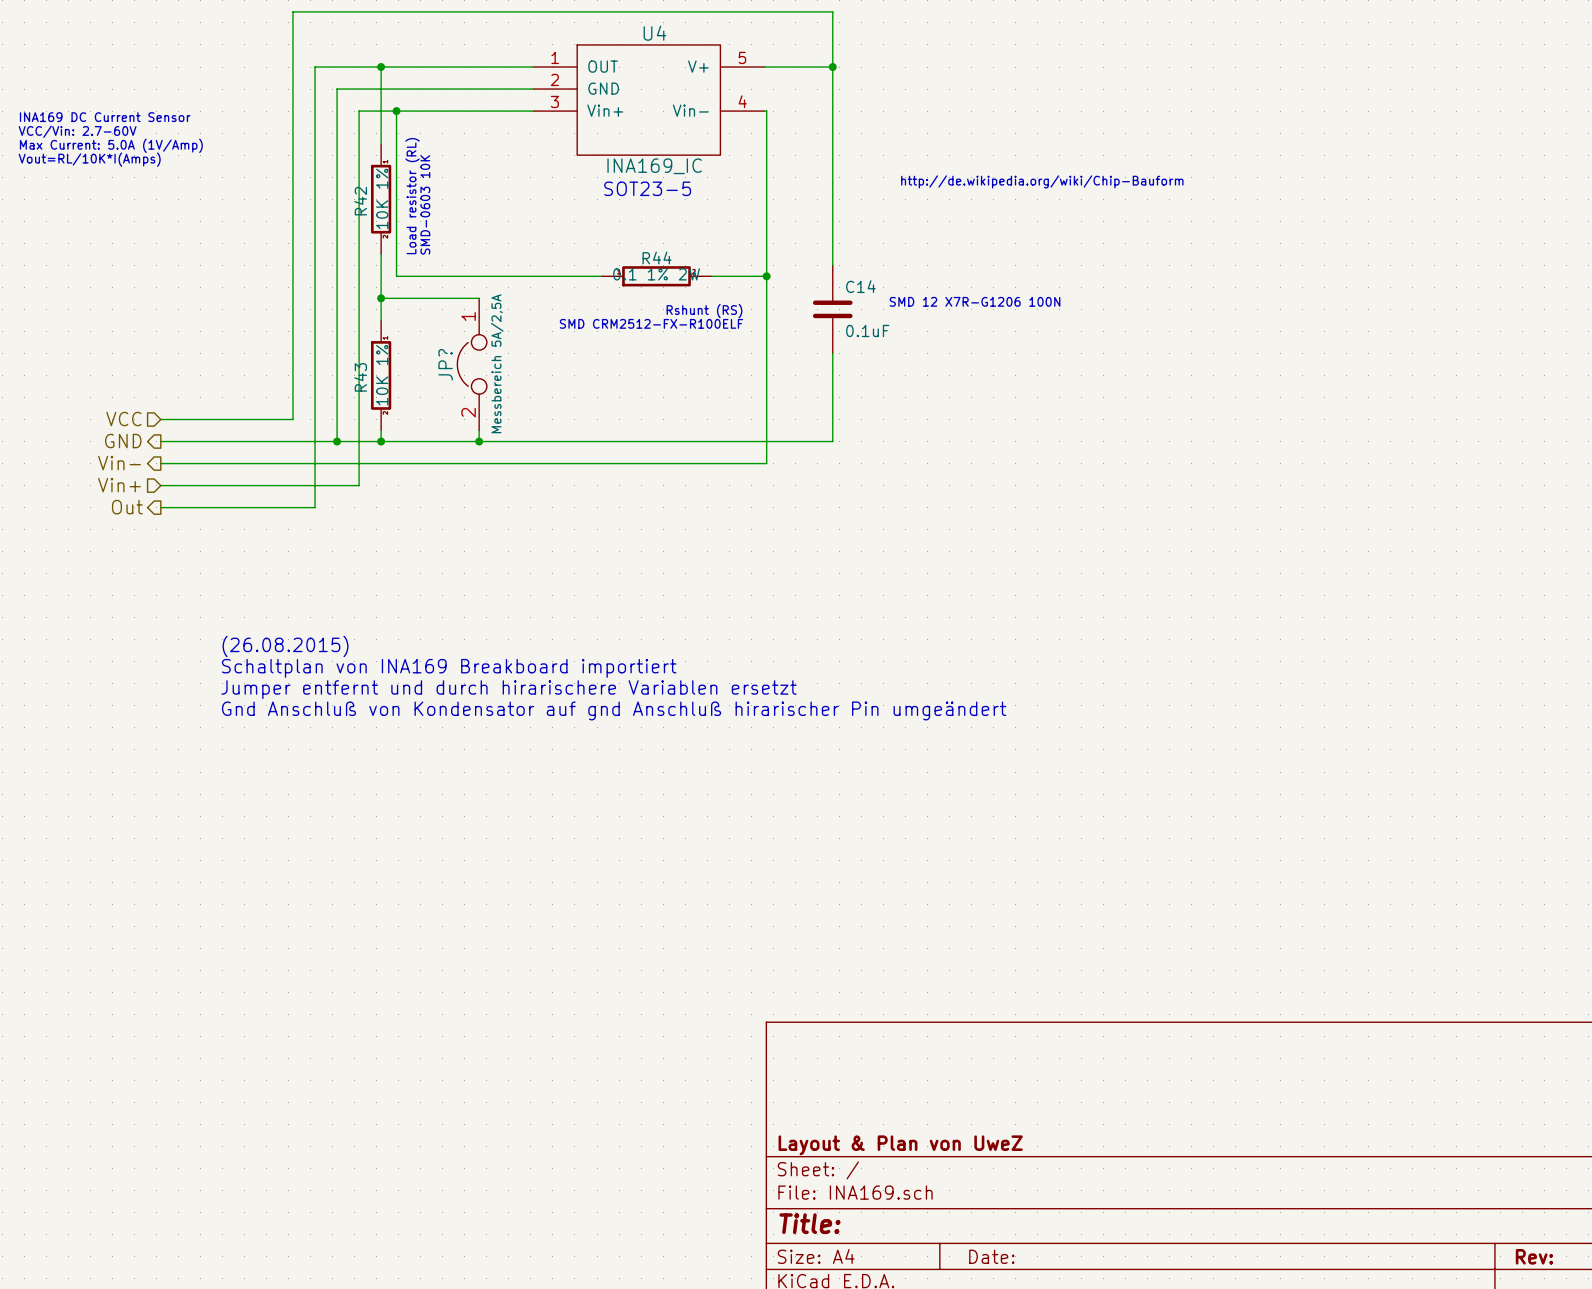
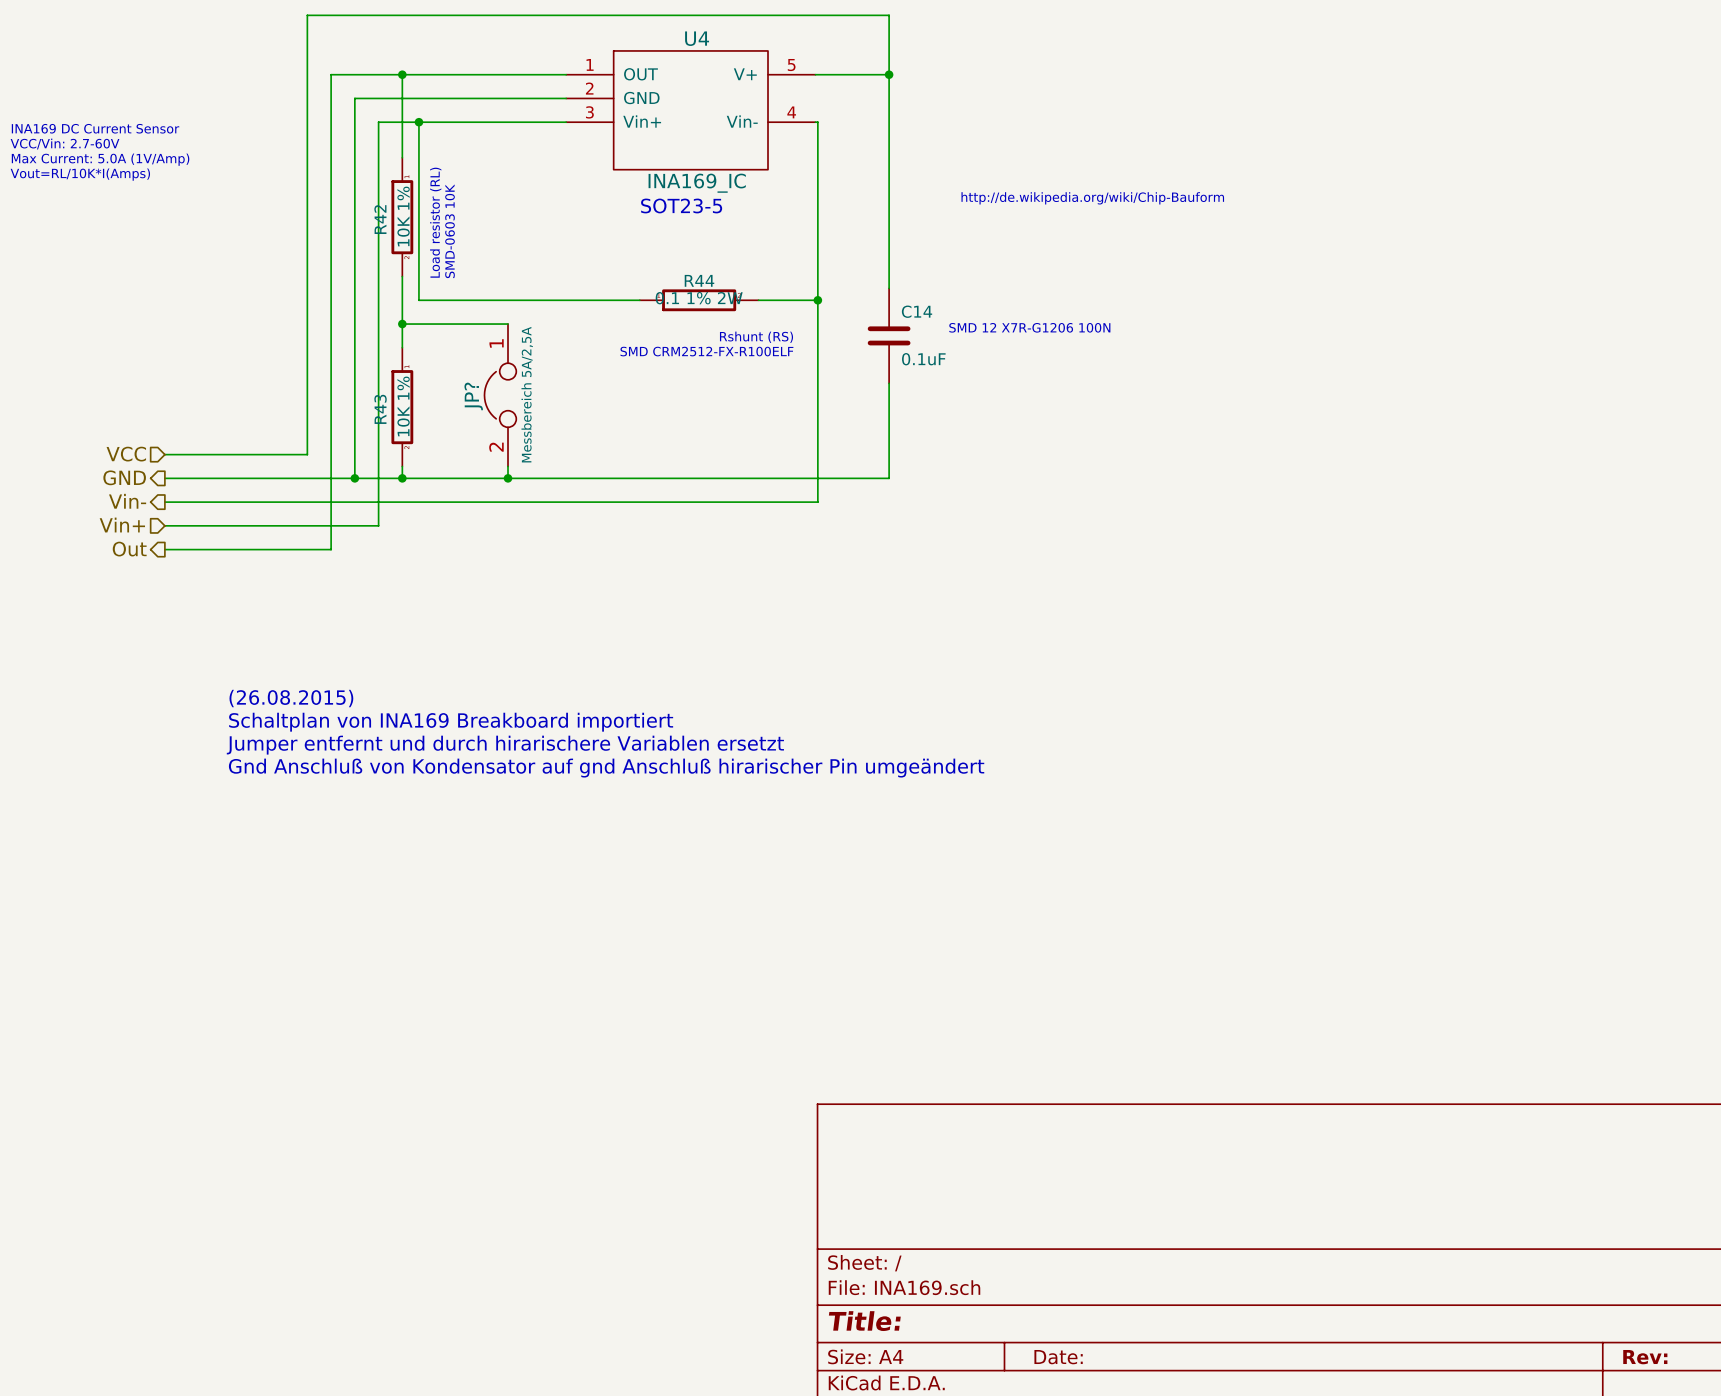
title block: Layout & Plan von UweZ (900, 1145) -> none

